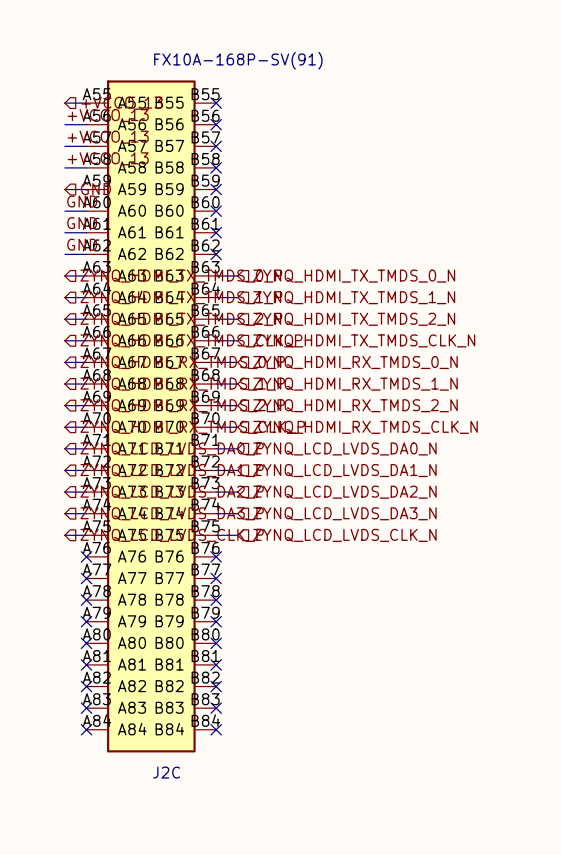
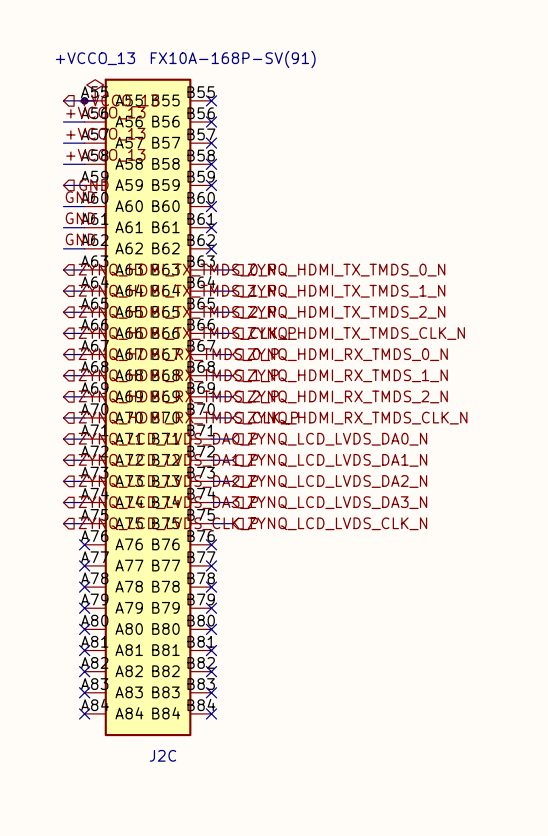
power symbol: none -> +VCCO_13 (95, 90)
junction: none -> (84, 100)

